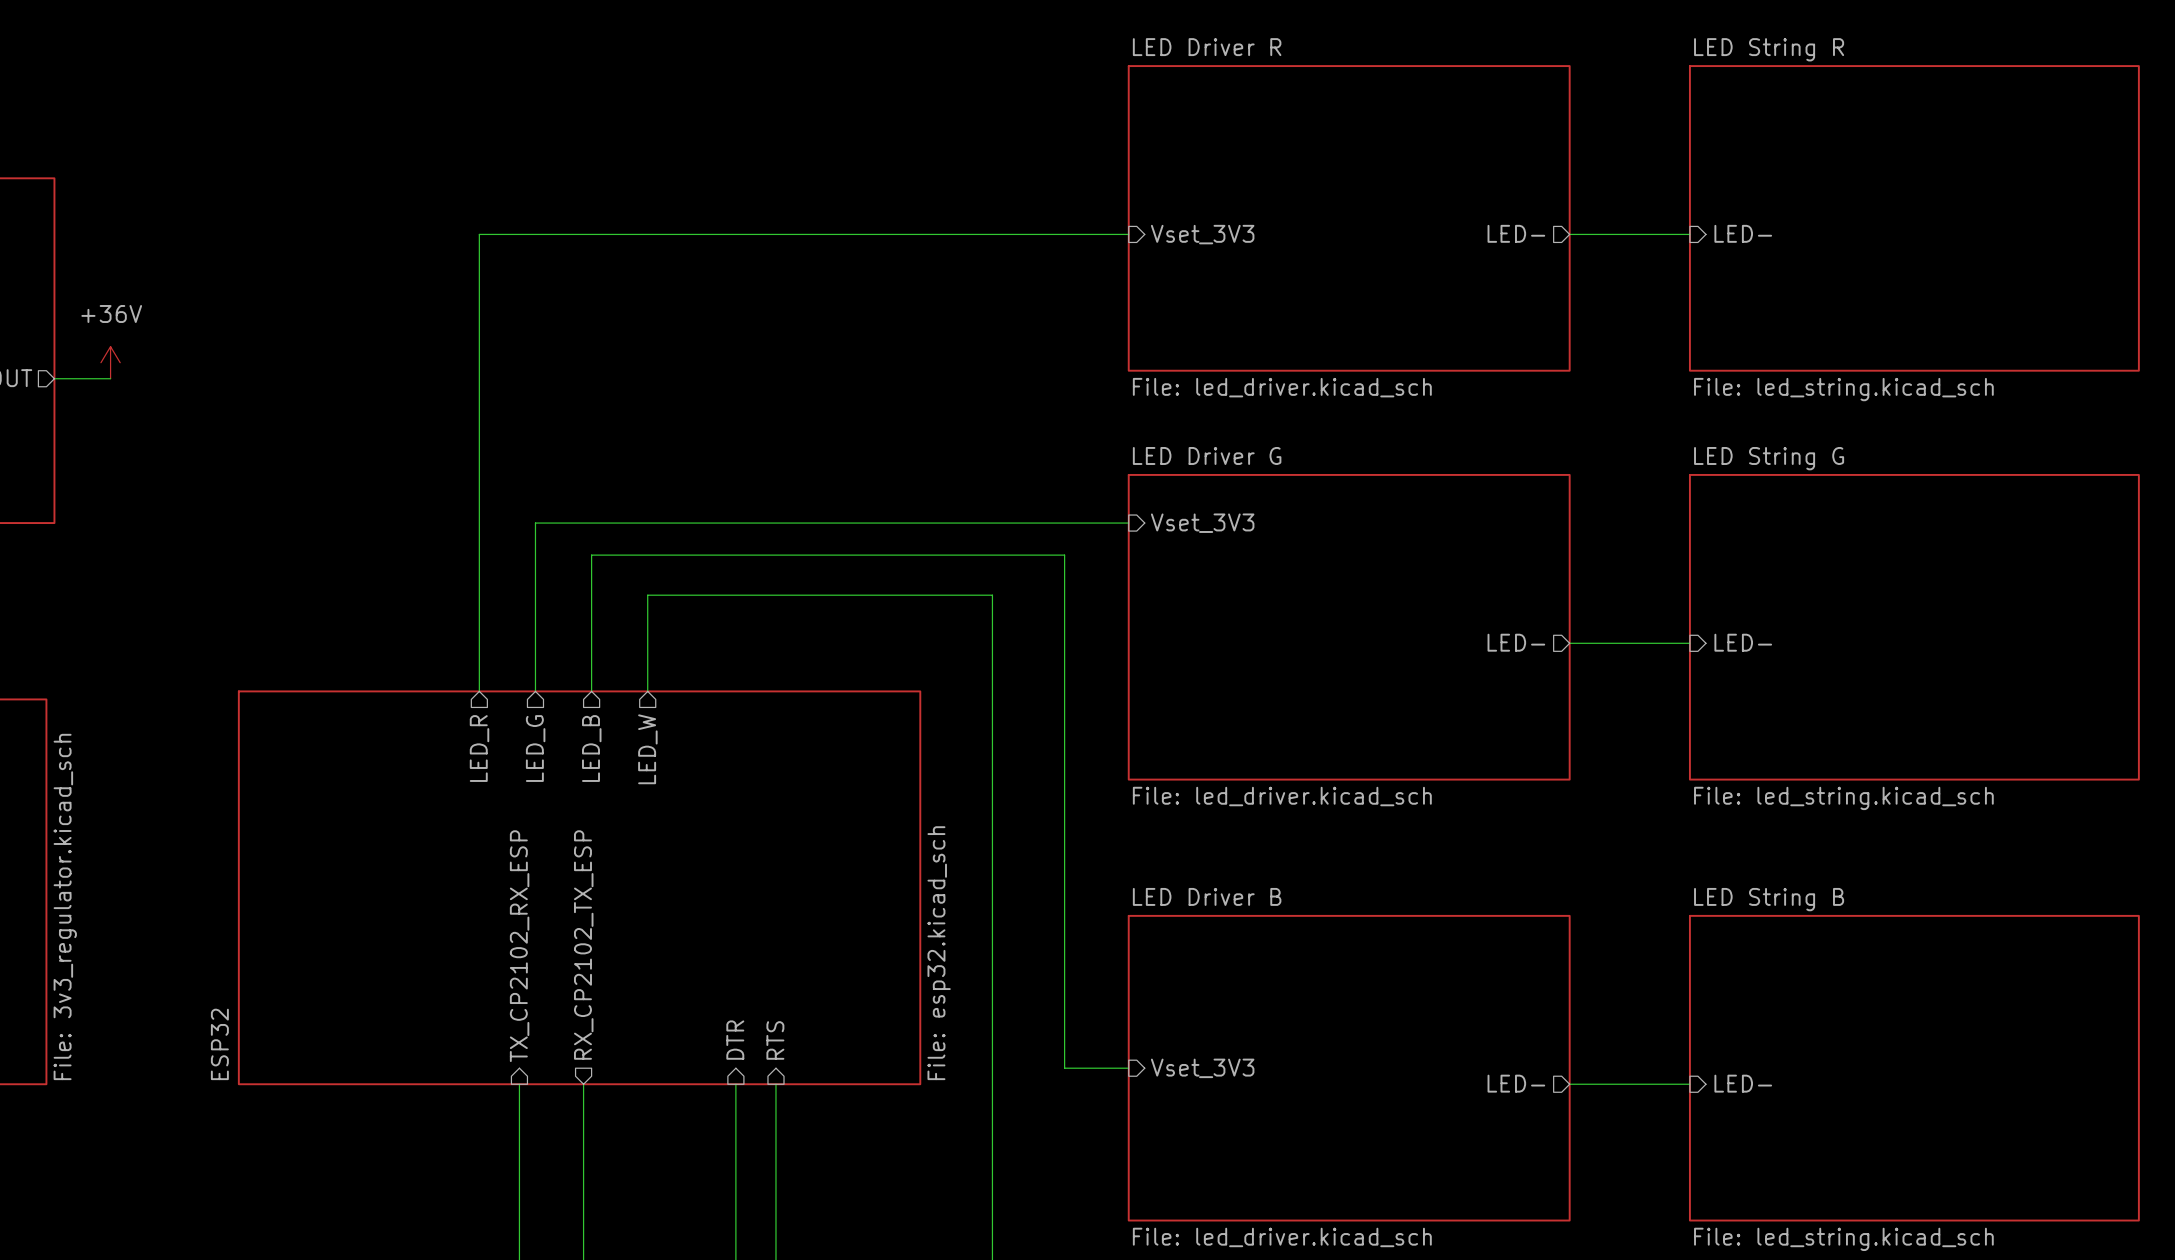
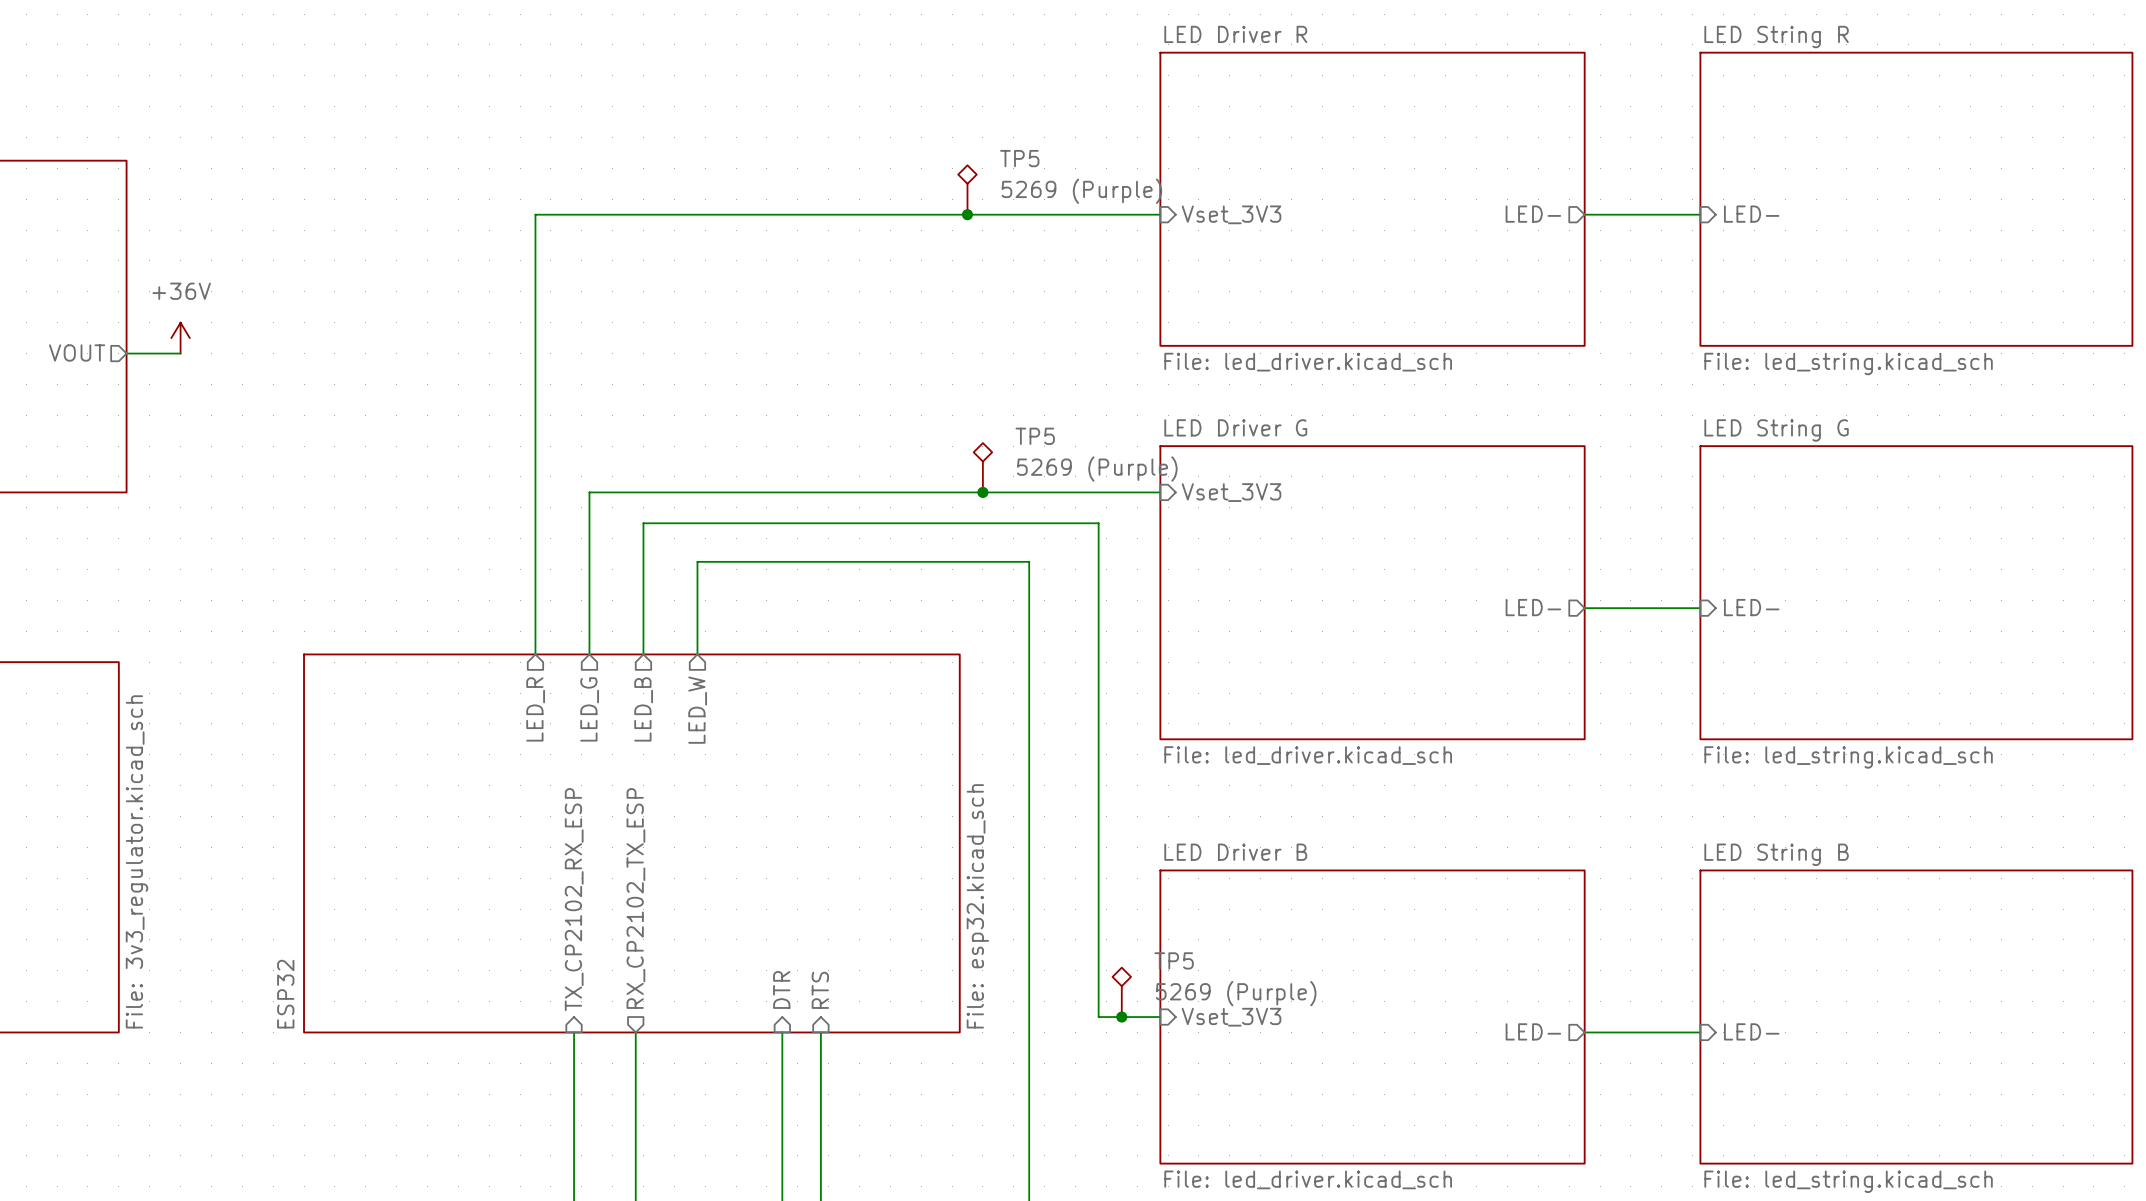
TP5: none -> 5269 (Purple) (967, 190)
junction: none -> (967, 214)
TP5: none -> 5269 (Purple) (982, 467)
junction: none -> (982, 492)
TP5: none -> 5269 (Purple) (1121, 992)
junction: none -> (1121, 1017)

